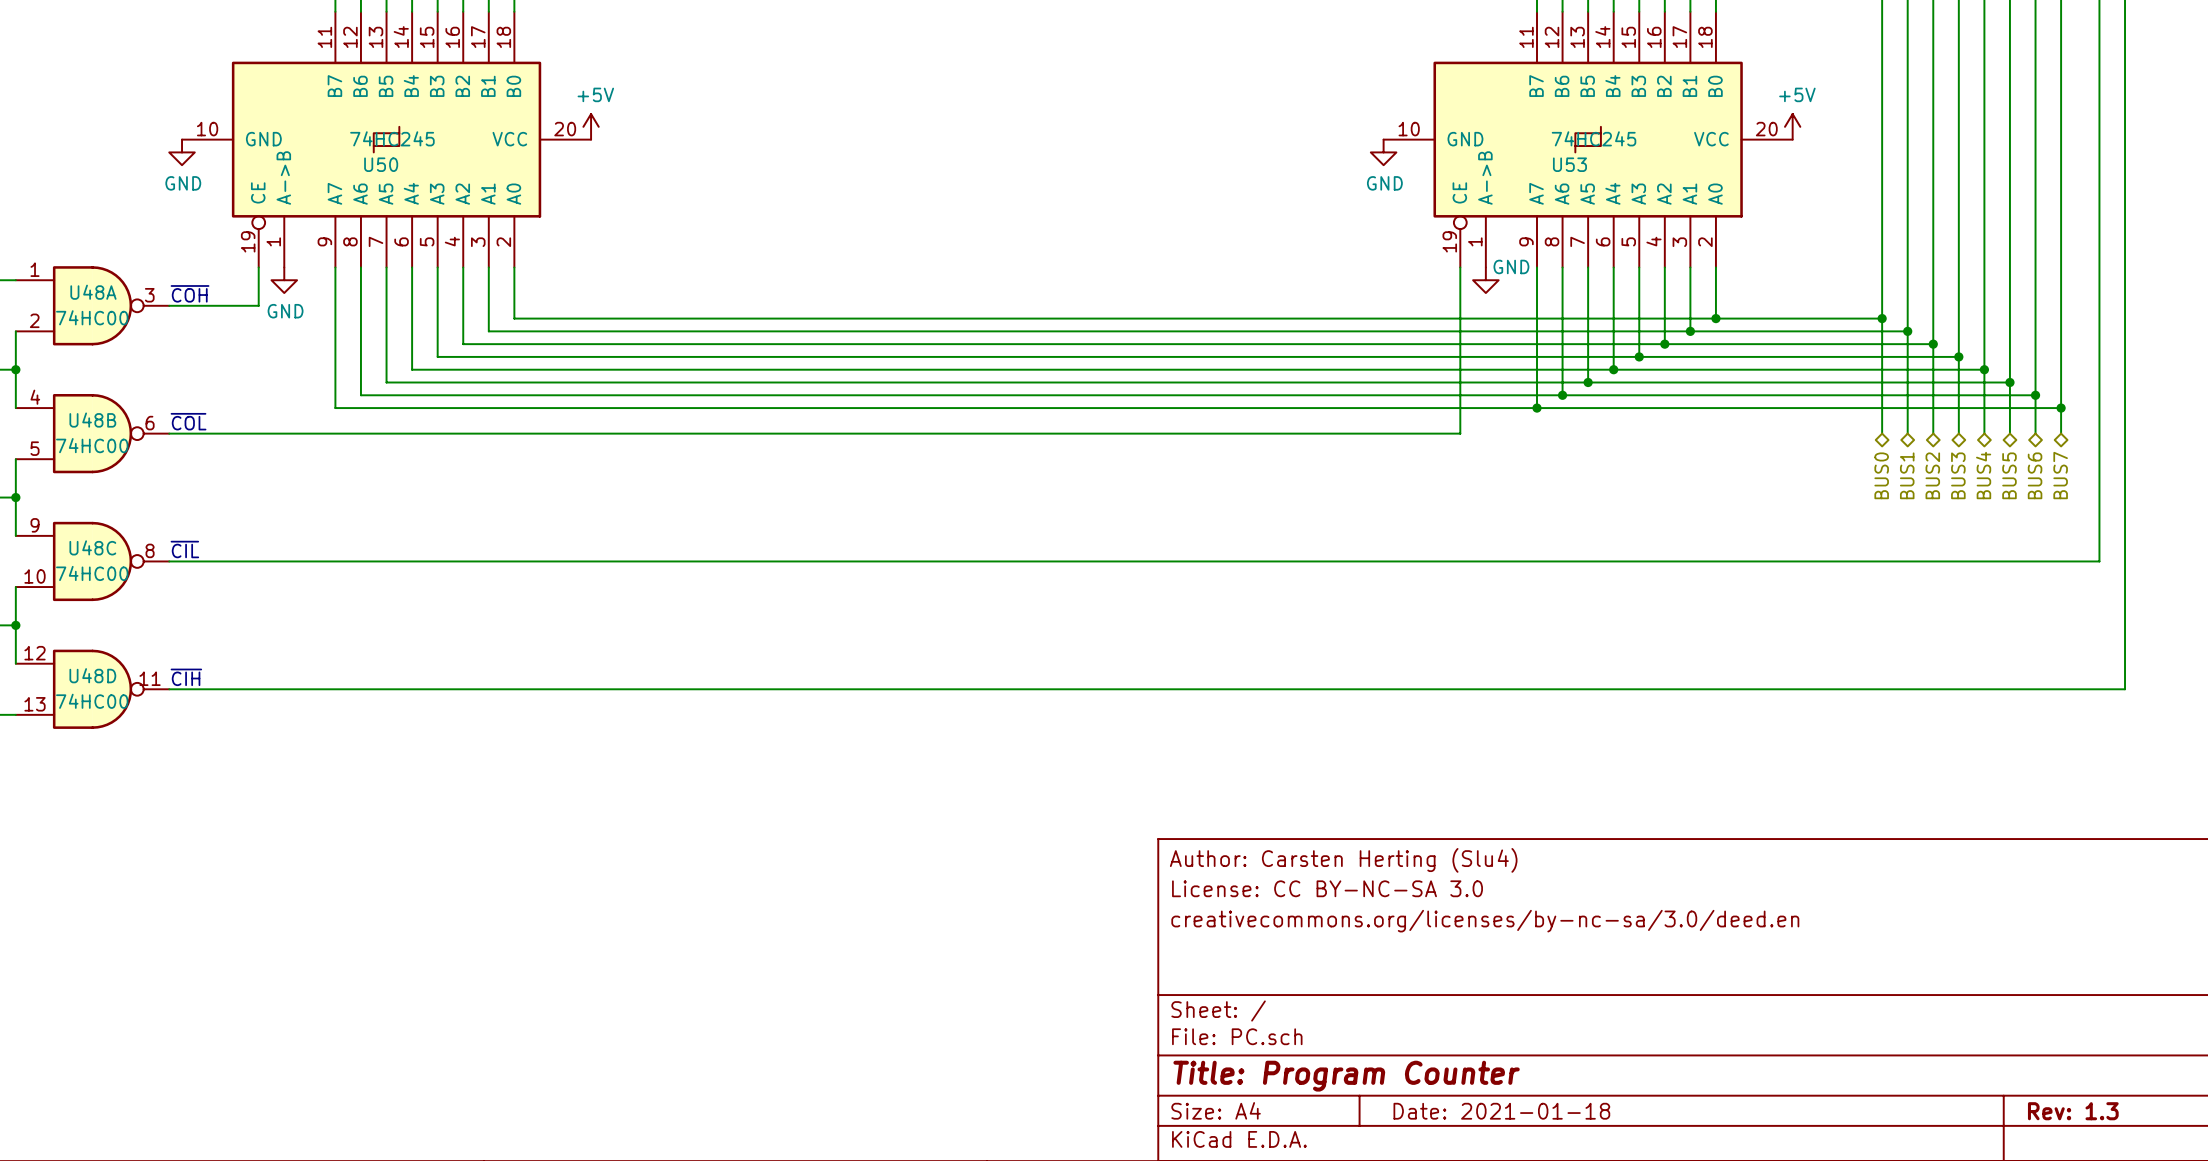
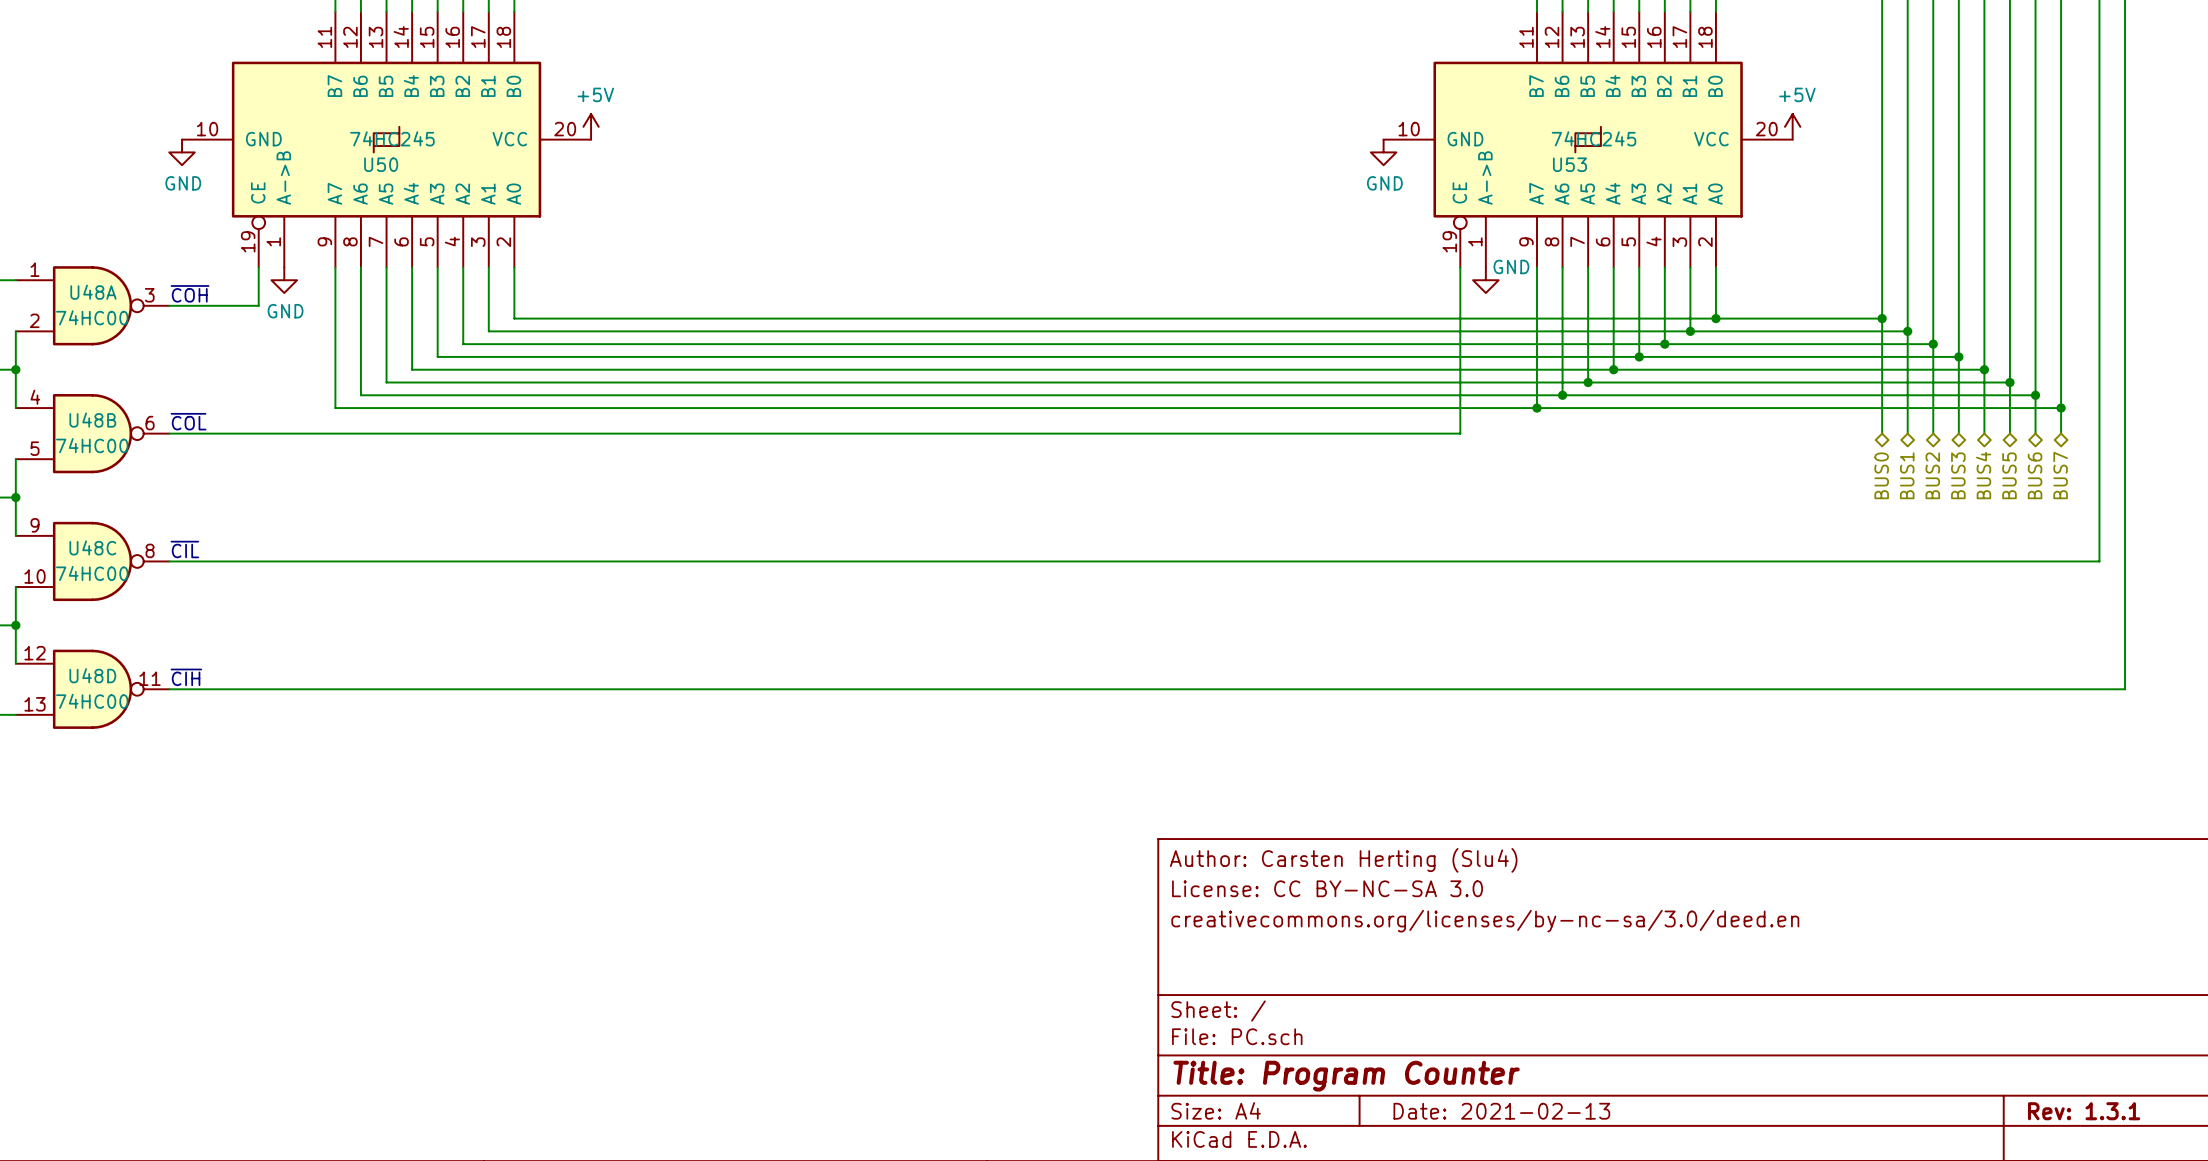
title block: Date: 2021-01-18 (1501, 1111) -> Date: 2021-02-13 (1501, 1111)
title block: Rev: 1.3 (2073, 1111) -> Rev: 1.3.1 (2084, 1111)

